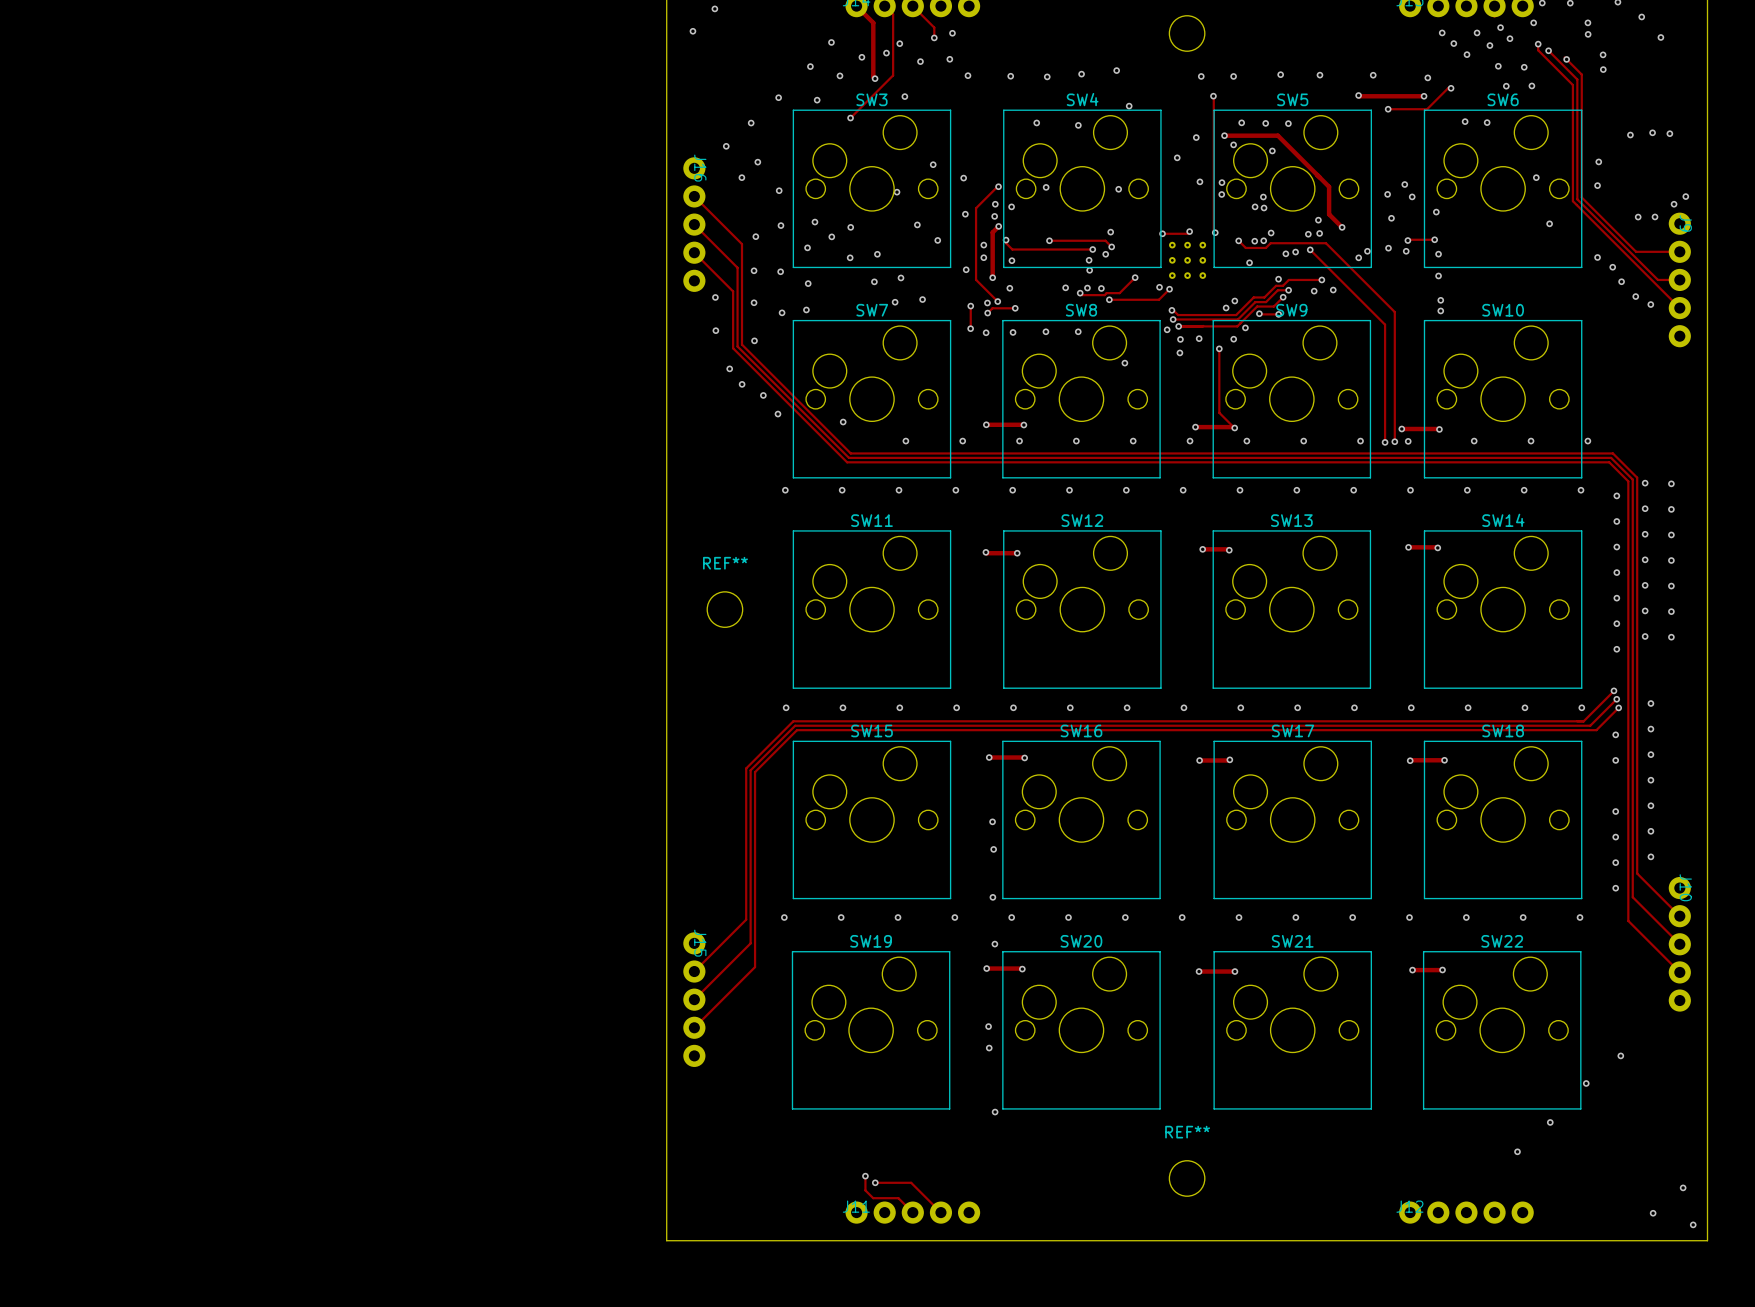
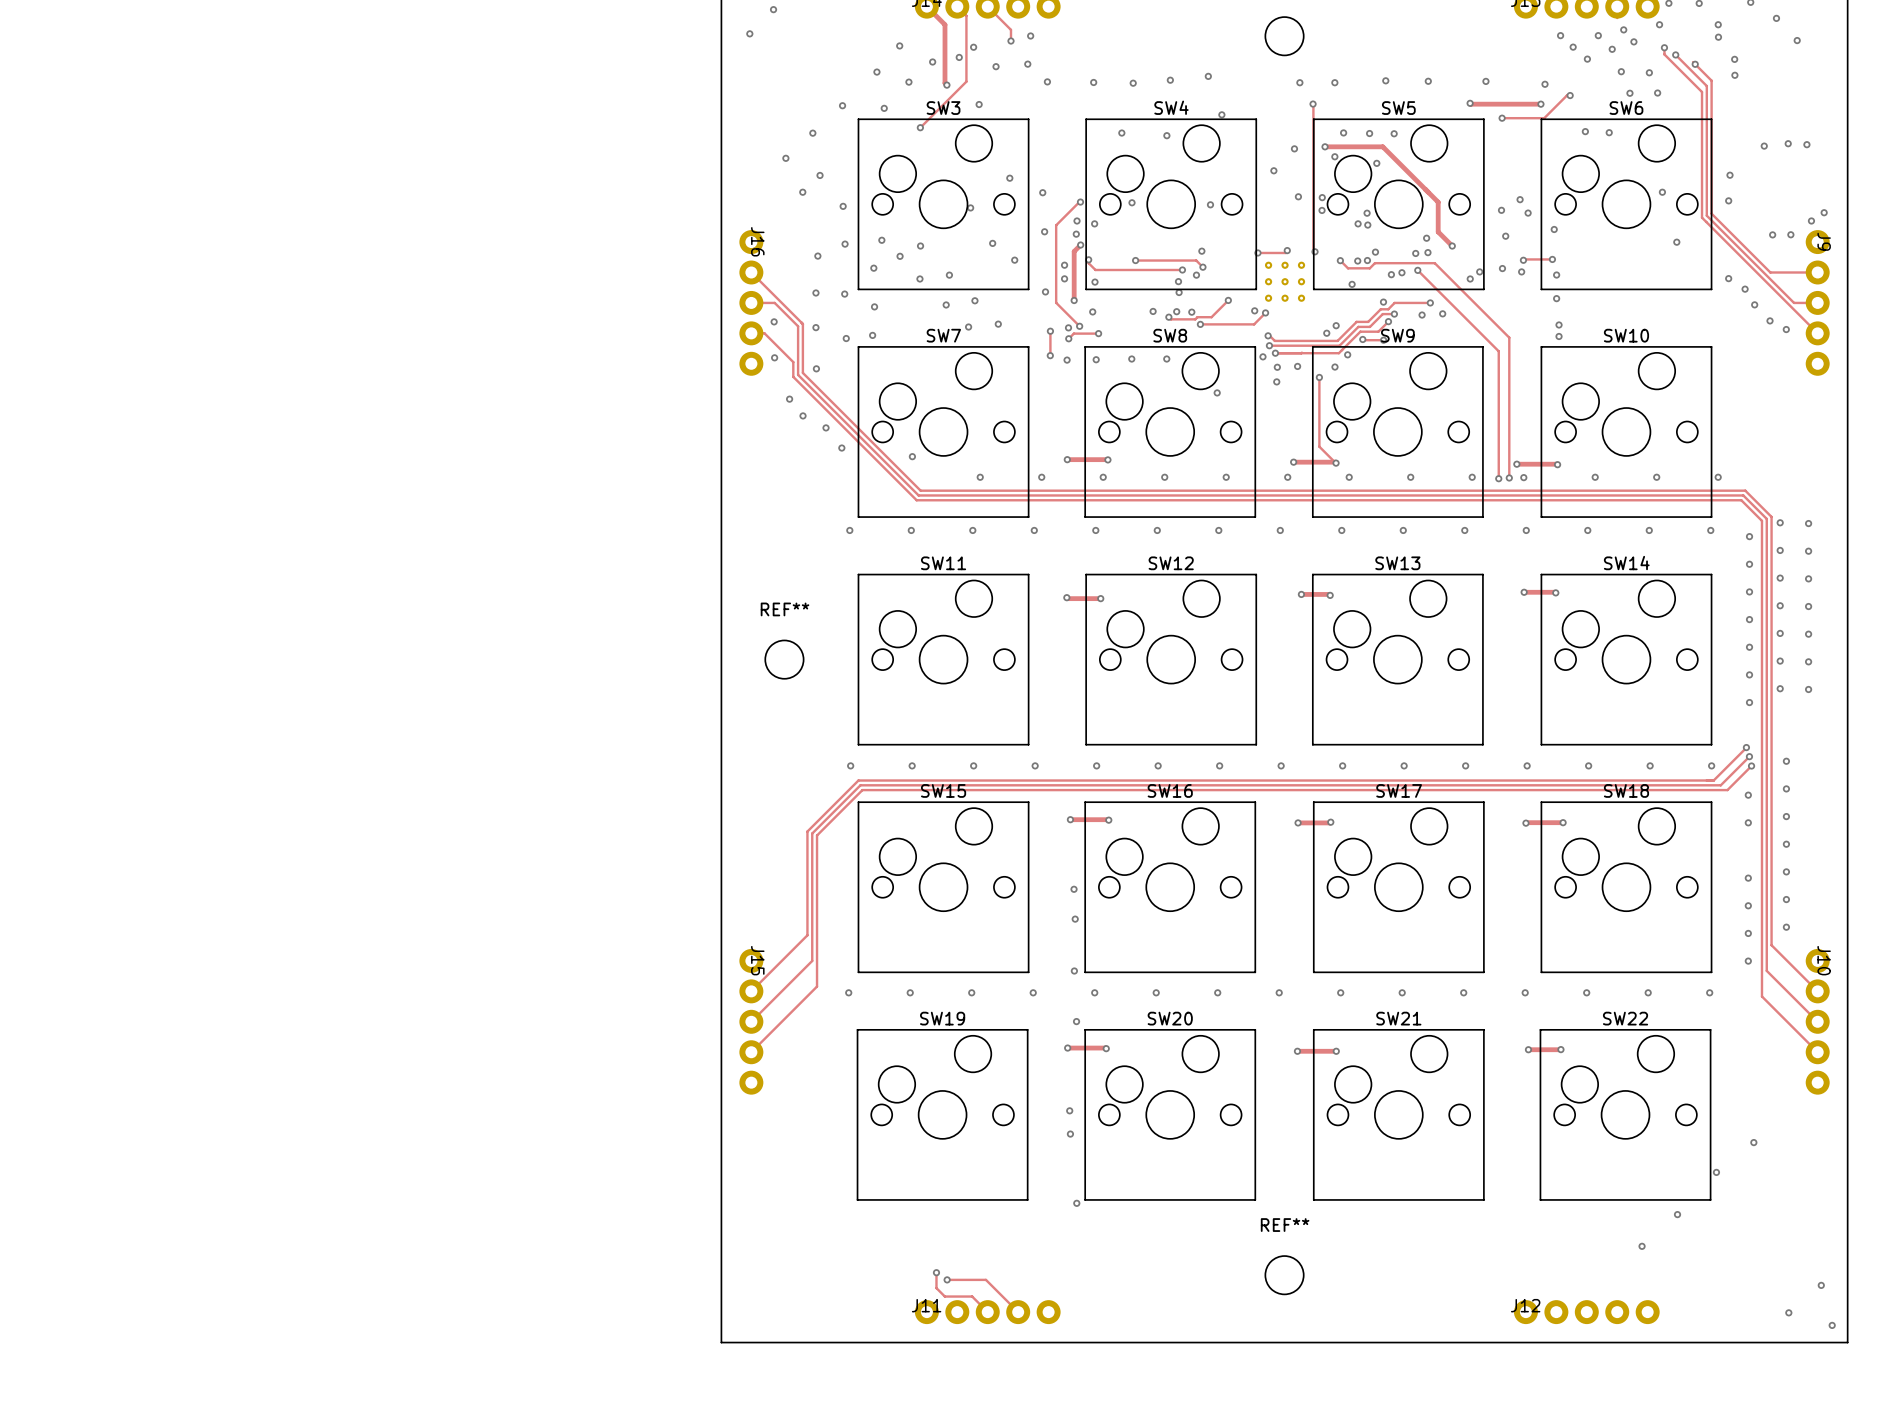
track: (694, 196) (741, 244) (741, 299) -> (751, 272) (802, 324)
track: (694, 224) (737, 267) (737, 301) -> (751, 302) (774, 302) (798, 326)
J16 position: (694, 224) -> (751, 302)
track: (694, 252) (733, 291) (733, 334) -> (751, 333) (764, 333) (793, 362)
track: (746, 864) (746, 919) (694, 971) -> (807, 935) (751, 991)
track: (750, 888) (750, 943) (694, 999) -> (812, 960) (751, 1021)
track: (755, 911) (755, 967) (694, 1027) -> (817, 986) (751, 1052)
J15 position: (694, 999) -> (751, 1021)

